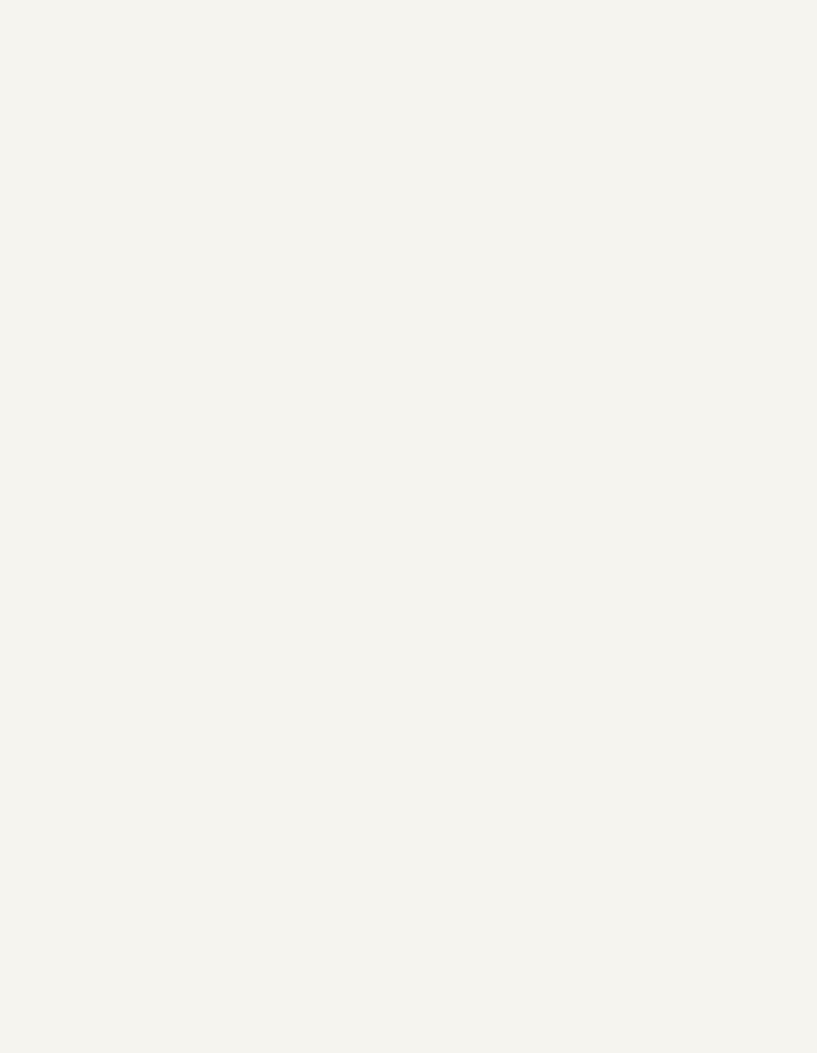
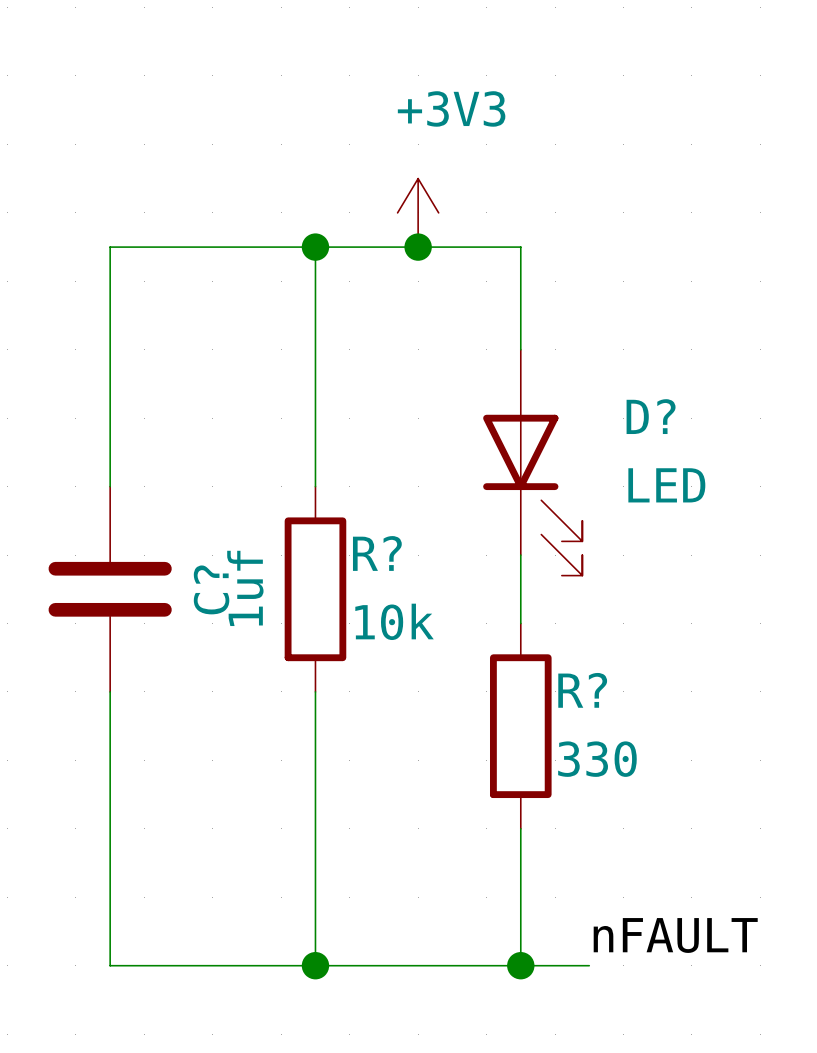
power symbol: none -> +3V3 (418, 212)
wire: none -> (315, 247) (315, 486)
junction: none -> (315, 247)
junction: none -> (418, 247)
wire: none -> (520, 349) (520, 247) (110, 247) (110, 486)
D?: none -> LED (532, 462)
wire: none -> (520, 555) (520, 623)
C?: none -> 1uf (110, 589)
R?: none -> 10k (315, 589)
wire: none -> (110, 691) (110, 965) (589, 965)
wire: none -> (315, 691) (315, 965)
R?: none -> 330 (520, 726)
wire: none -> (520, 828) (520, 965)
label: none -> nFAULT (675, 935)
junction: none -> (315, 965)
junction: none -> (520, 965)

